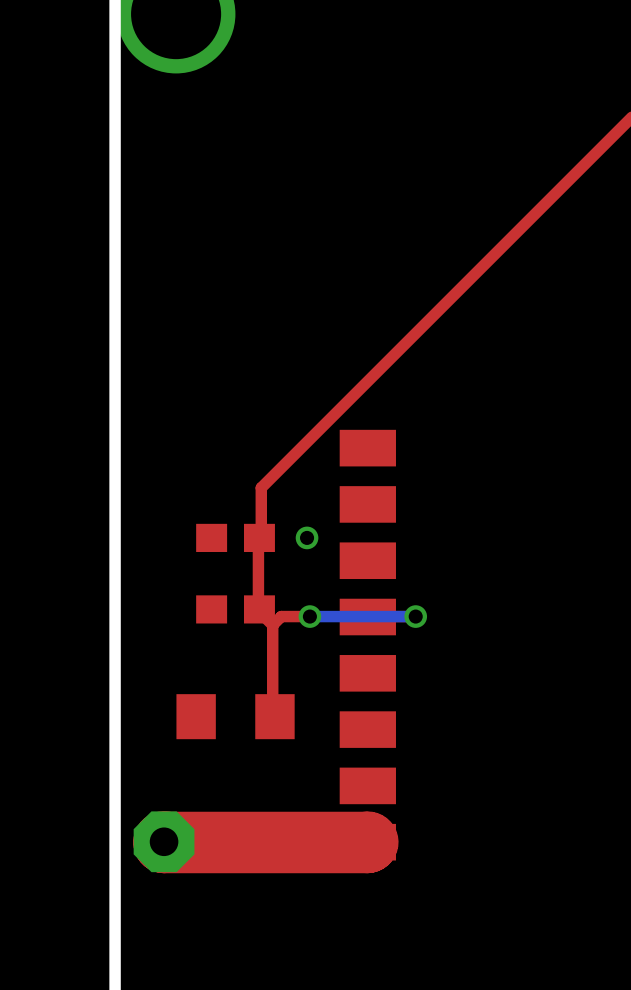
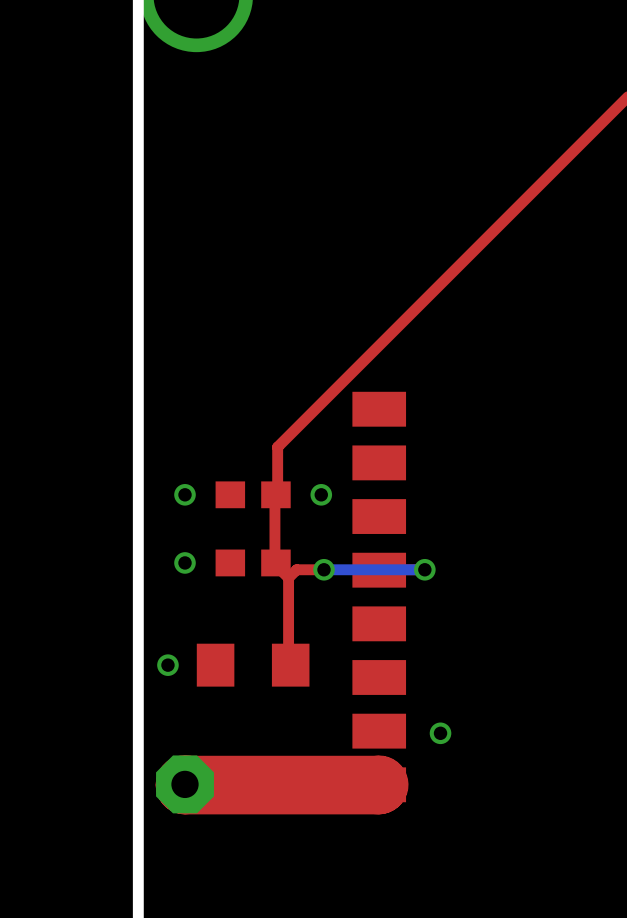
via: none -> (185, 494)
via: none -> (185, 562)
via: none -> (167, 665)
via: none -> (440, 733)

